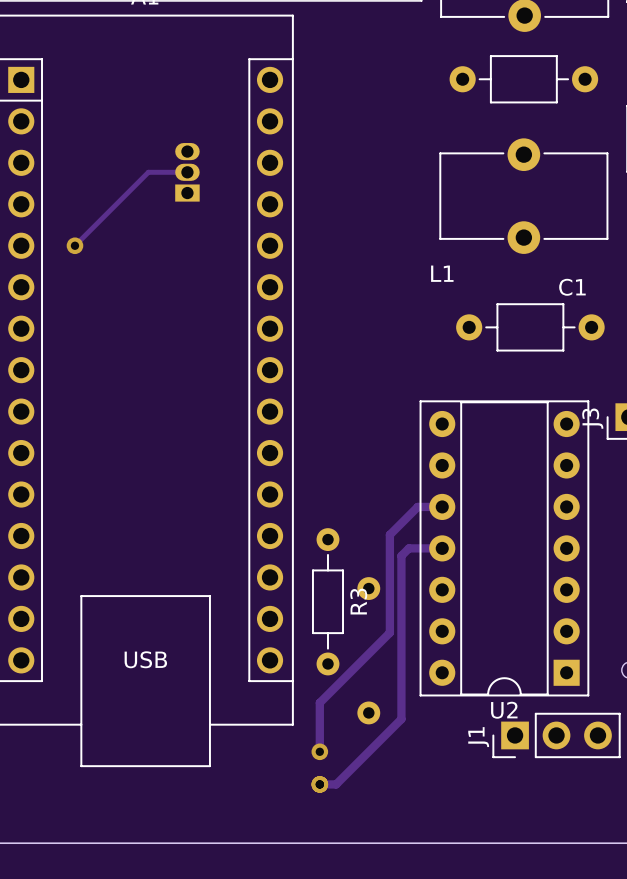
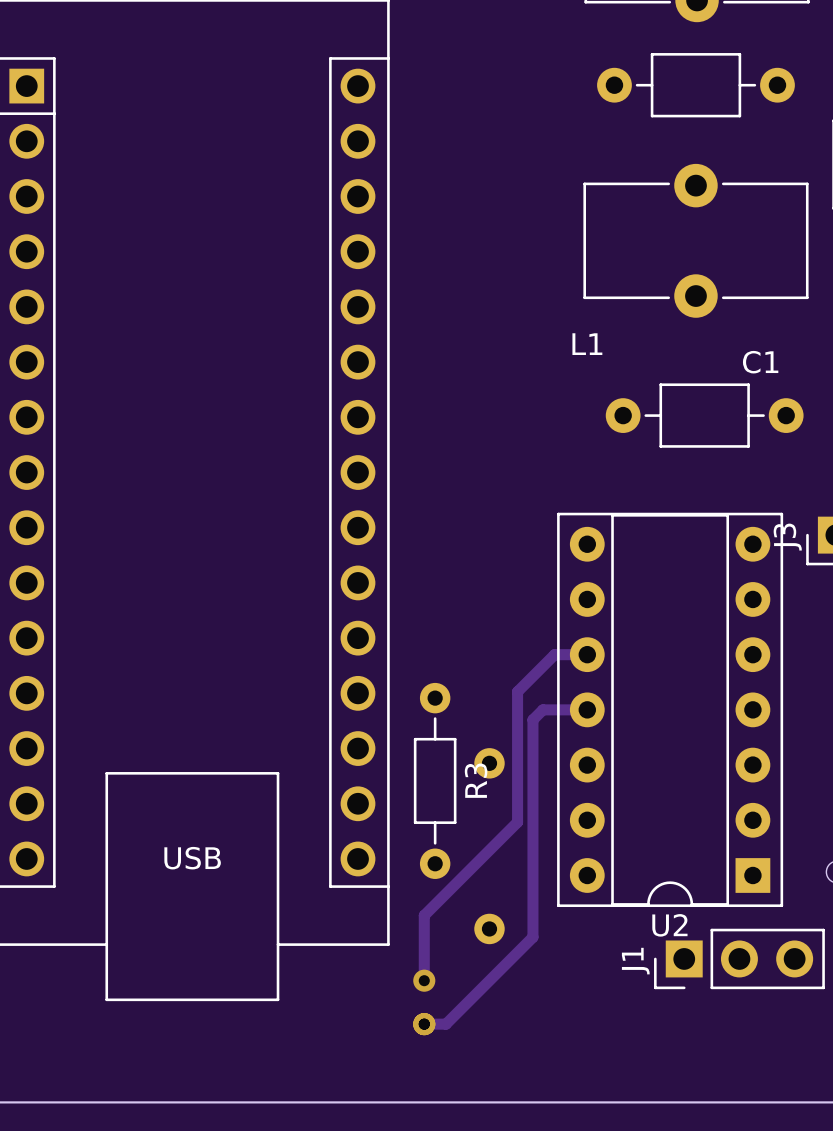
track: (187, 172) (148, 172) (74, 245) -> none
part: (187, 172) -> none
via: (74, 245) -> none

